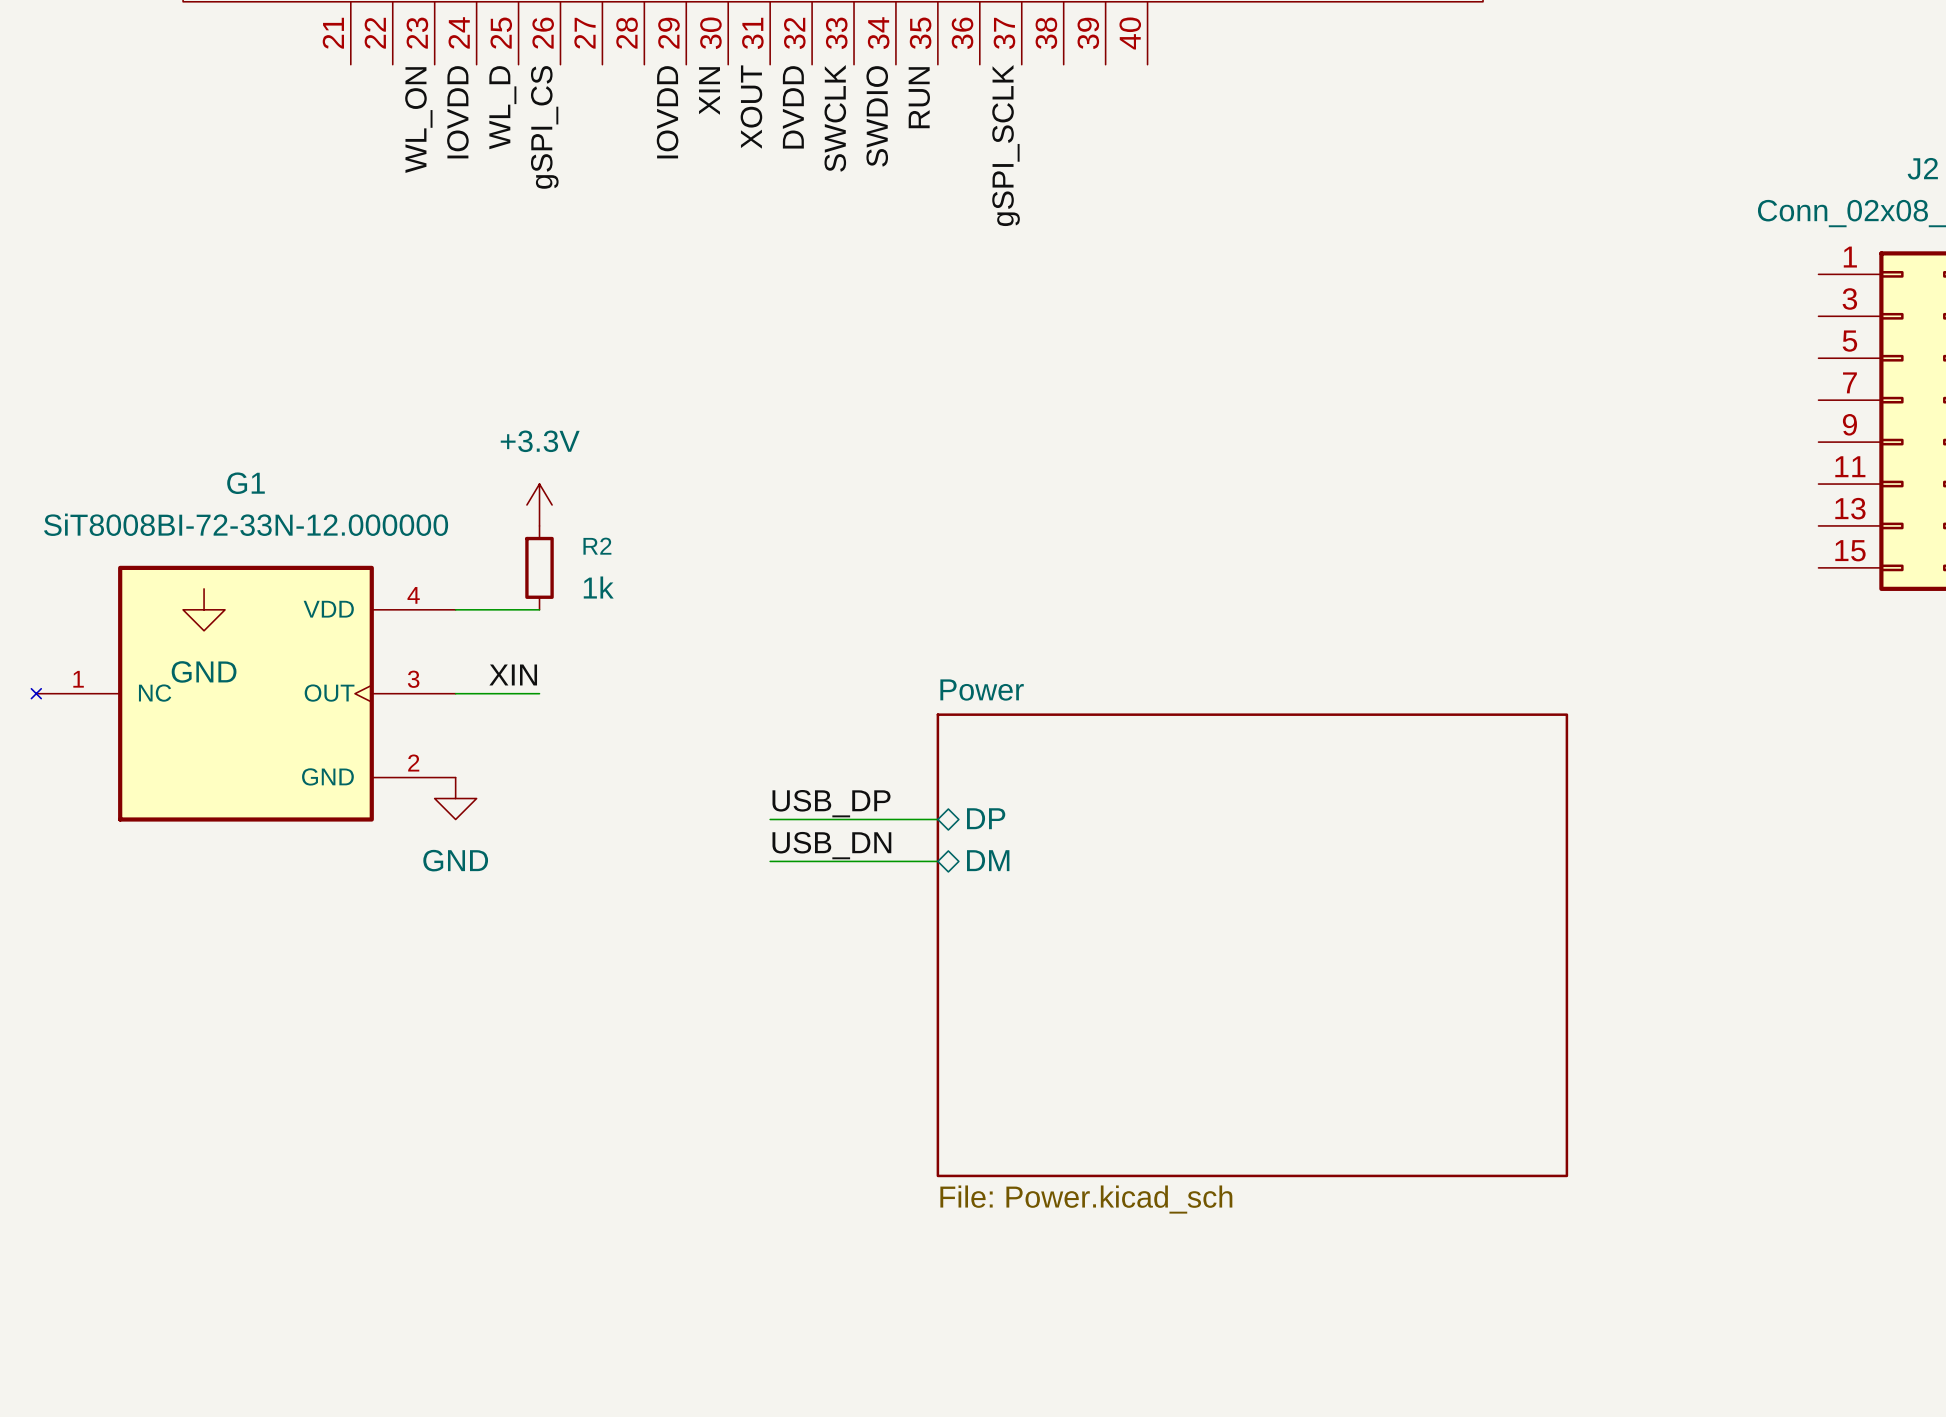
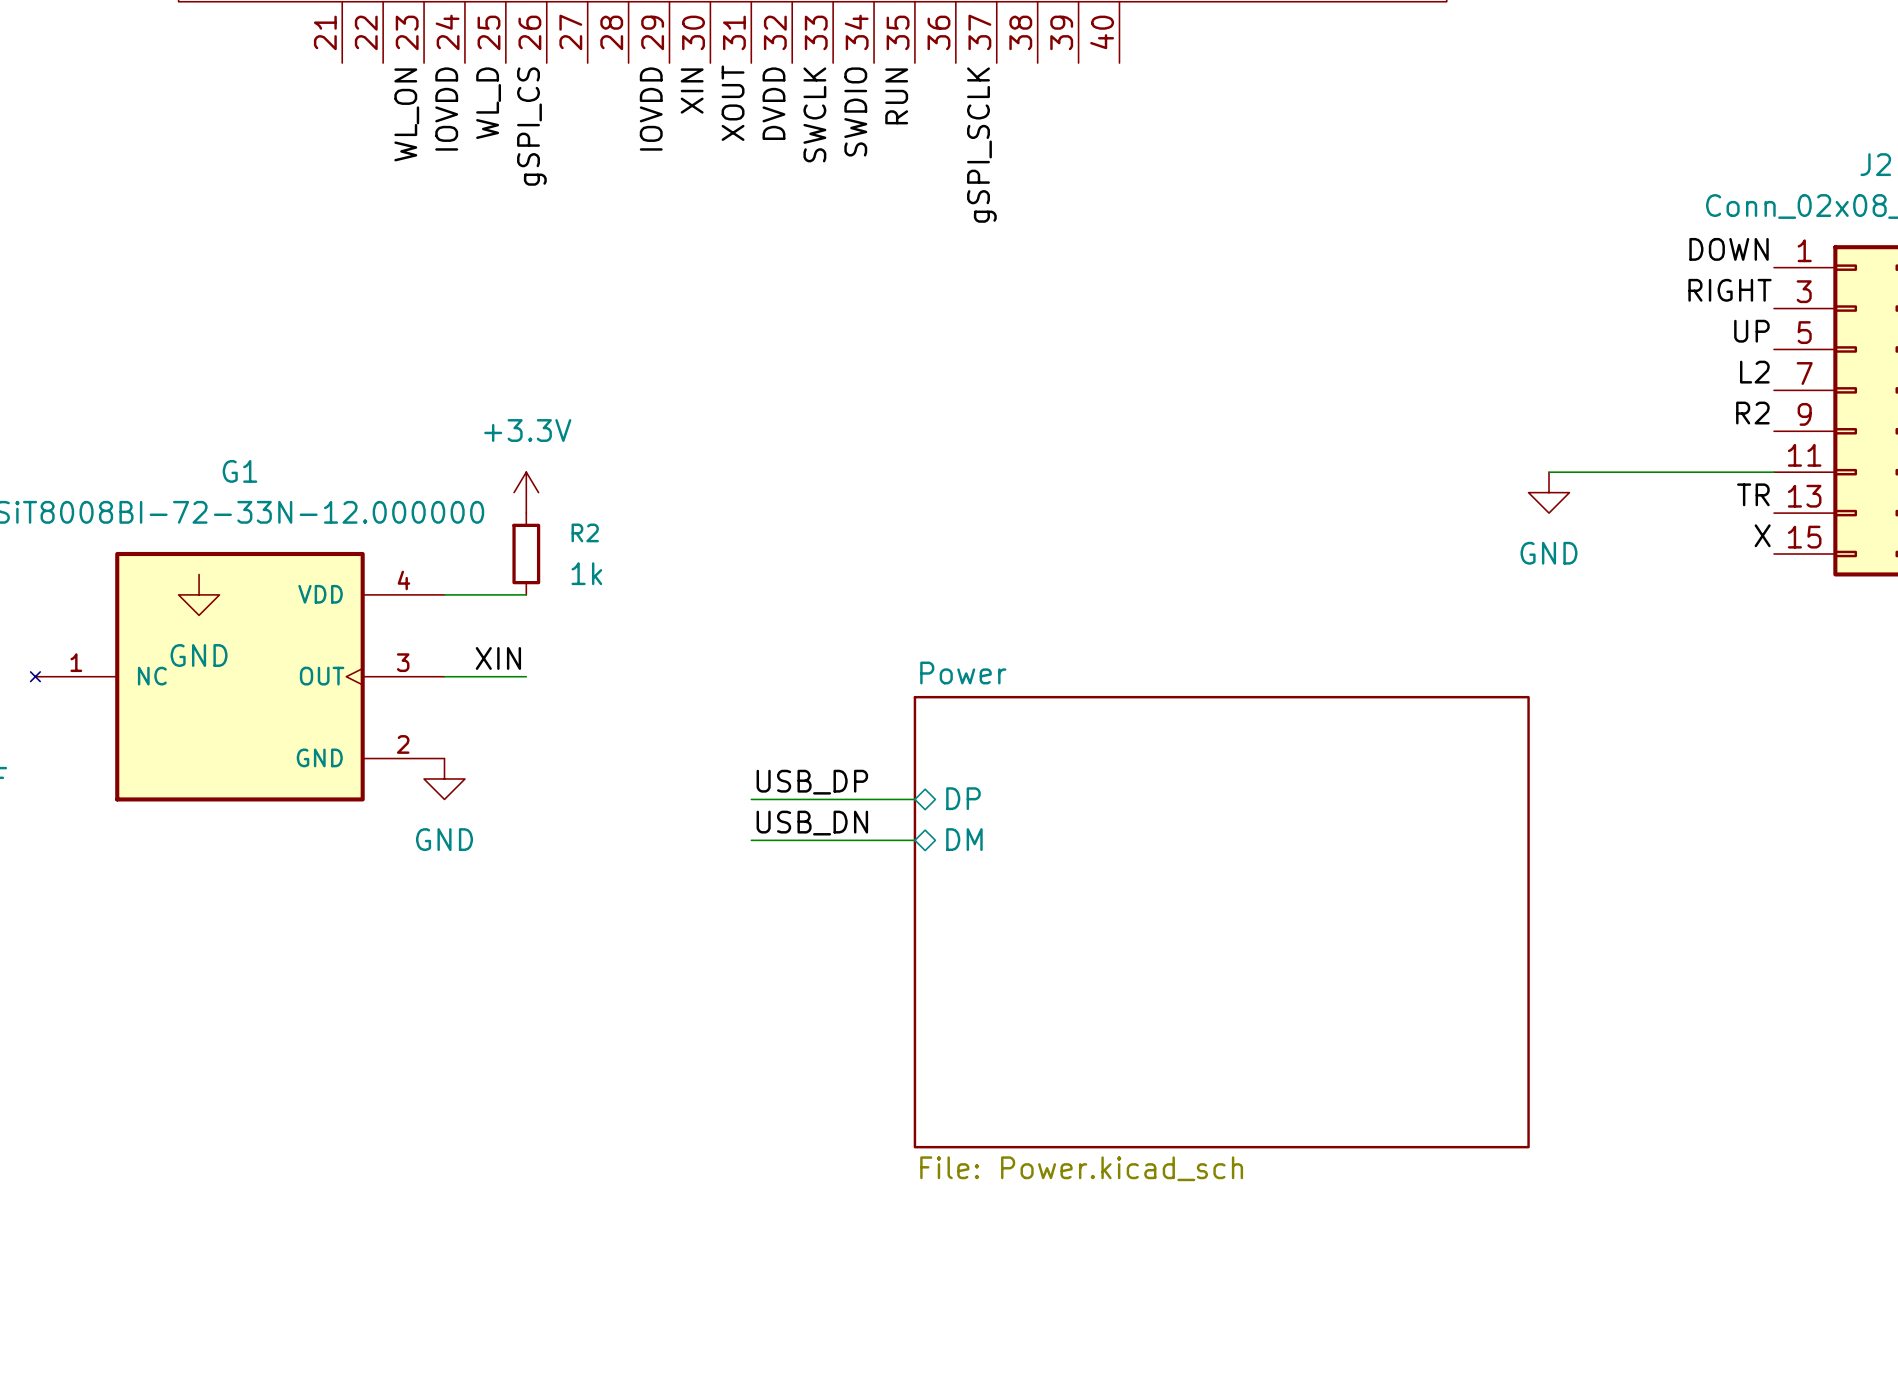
label: none -> DOWN (1729, 249)
label: none -> RIGHT (1730, 290)
label: none -> UP (1751, 331)
label: none -> L2 (1754, 372)
label: none -> R2 (1752, 413)
wire: none -> (1549, 472) (1773, 472)
power symbol: none -> GND (1549, 492)
label: none -> TR (1753, 494)
label: none -> X (1762, 535)

